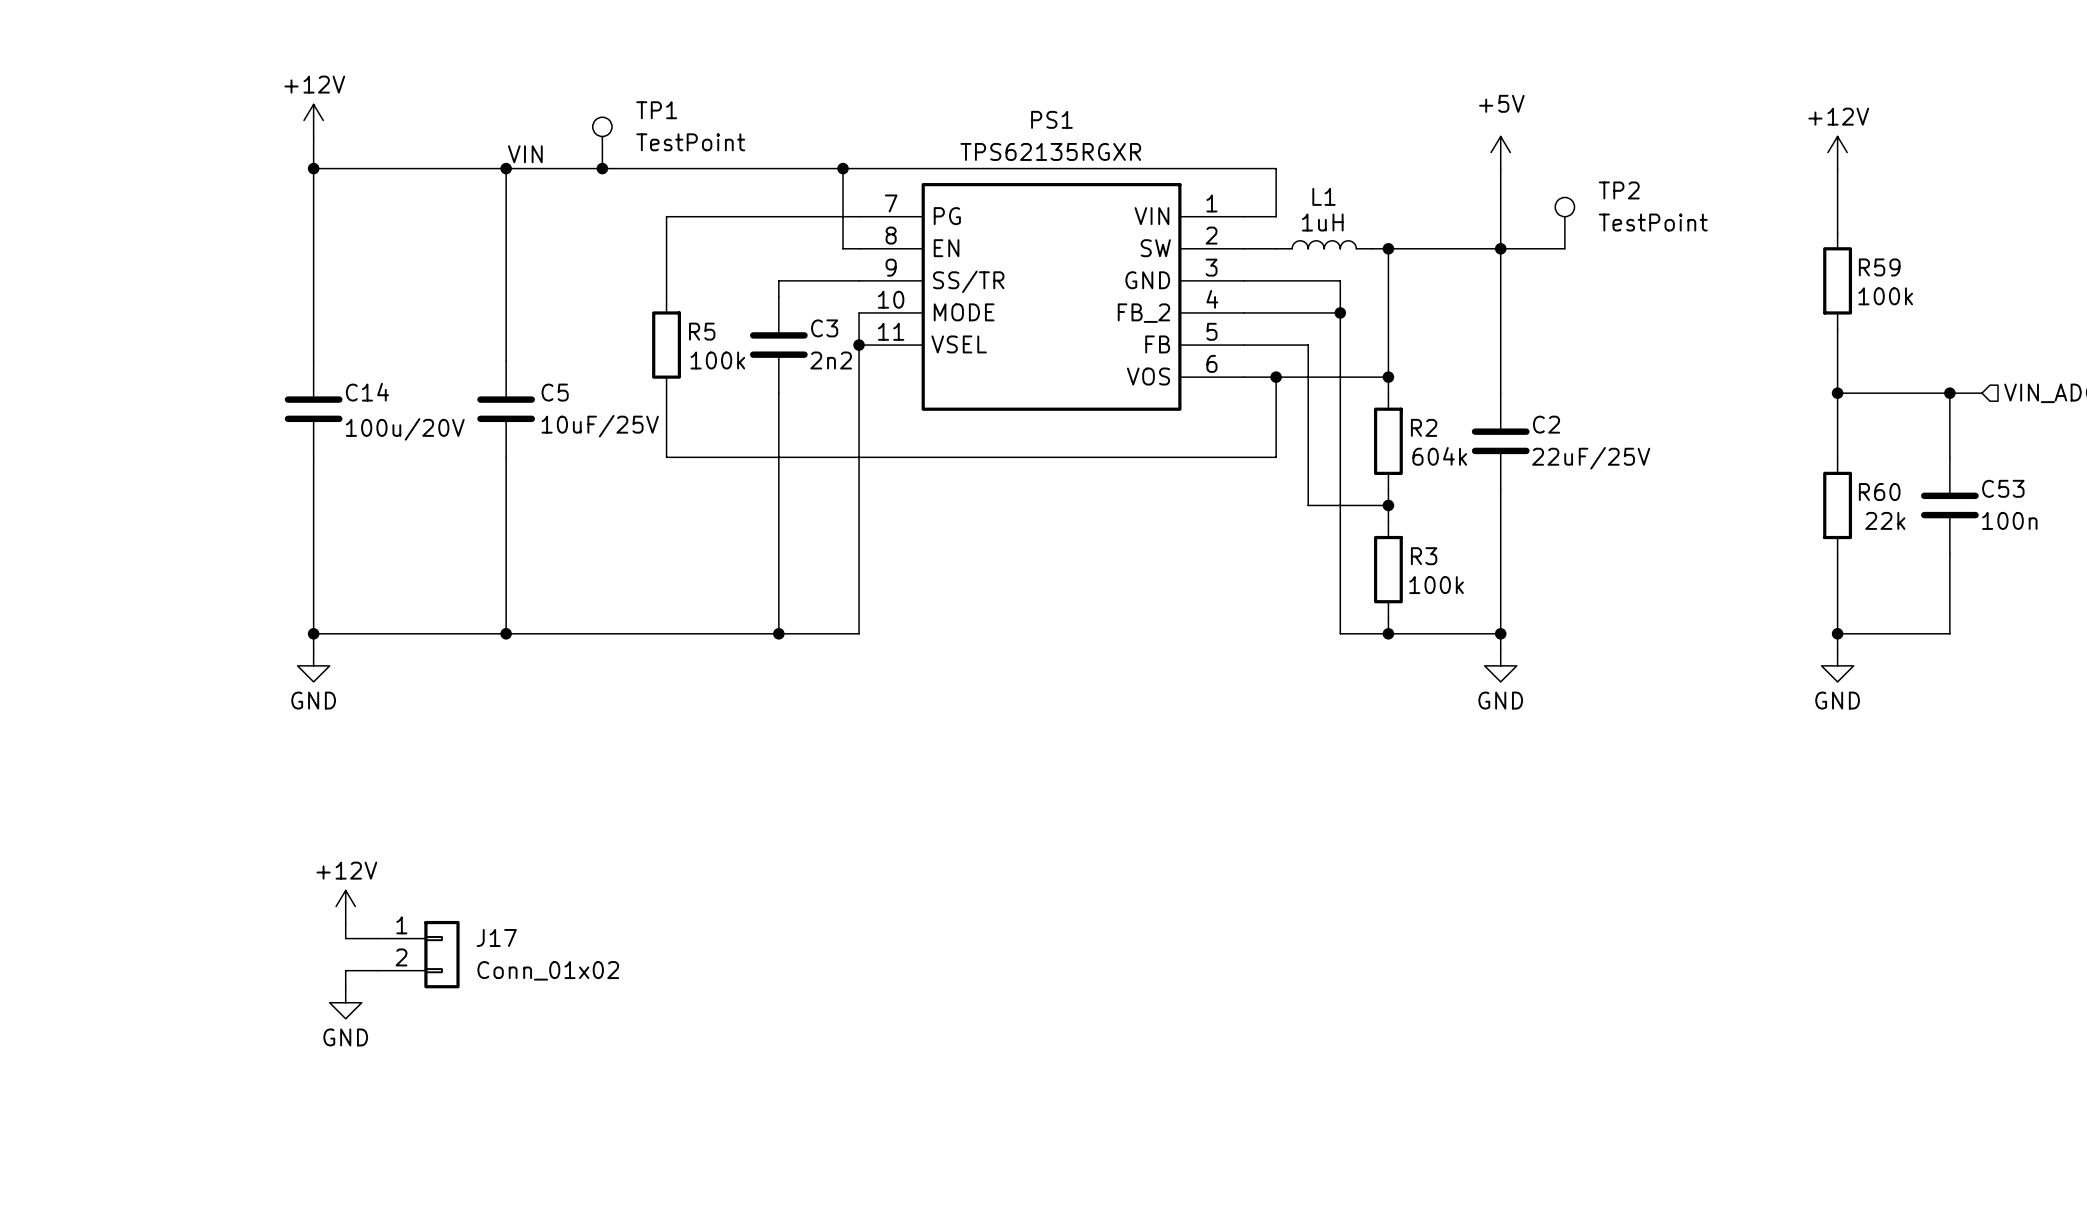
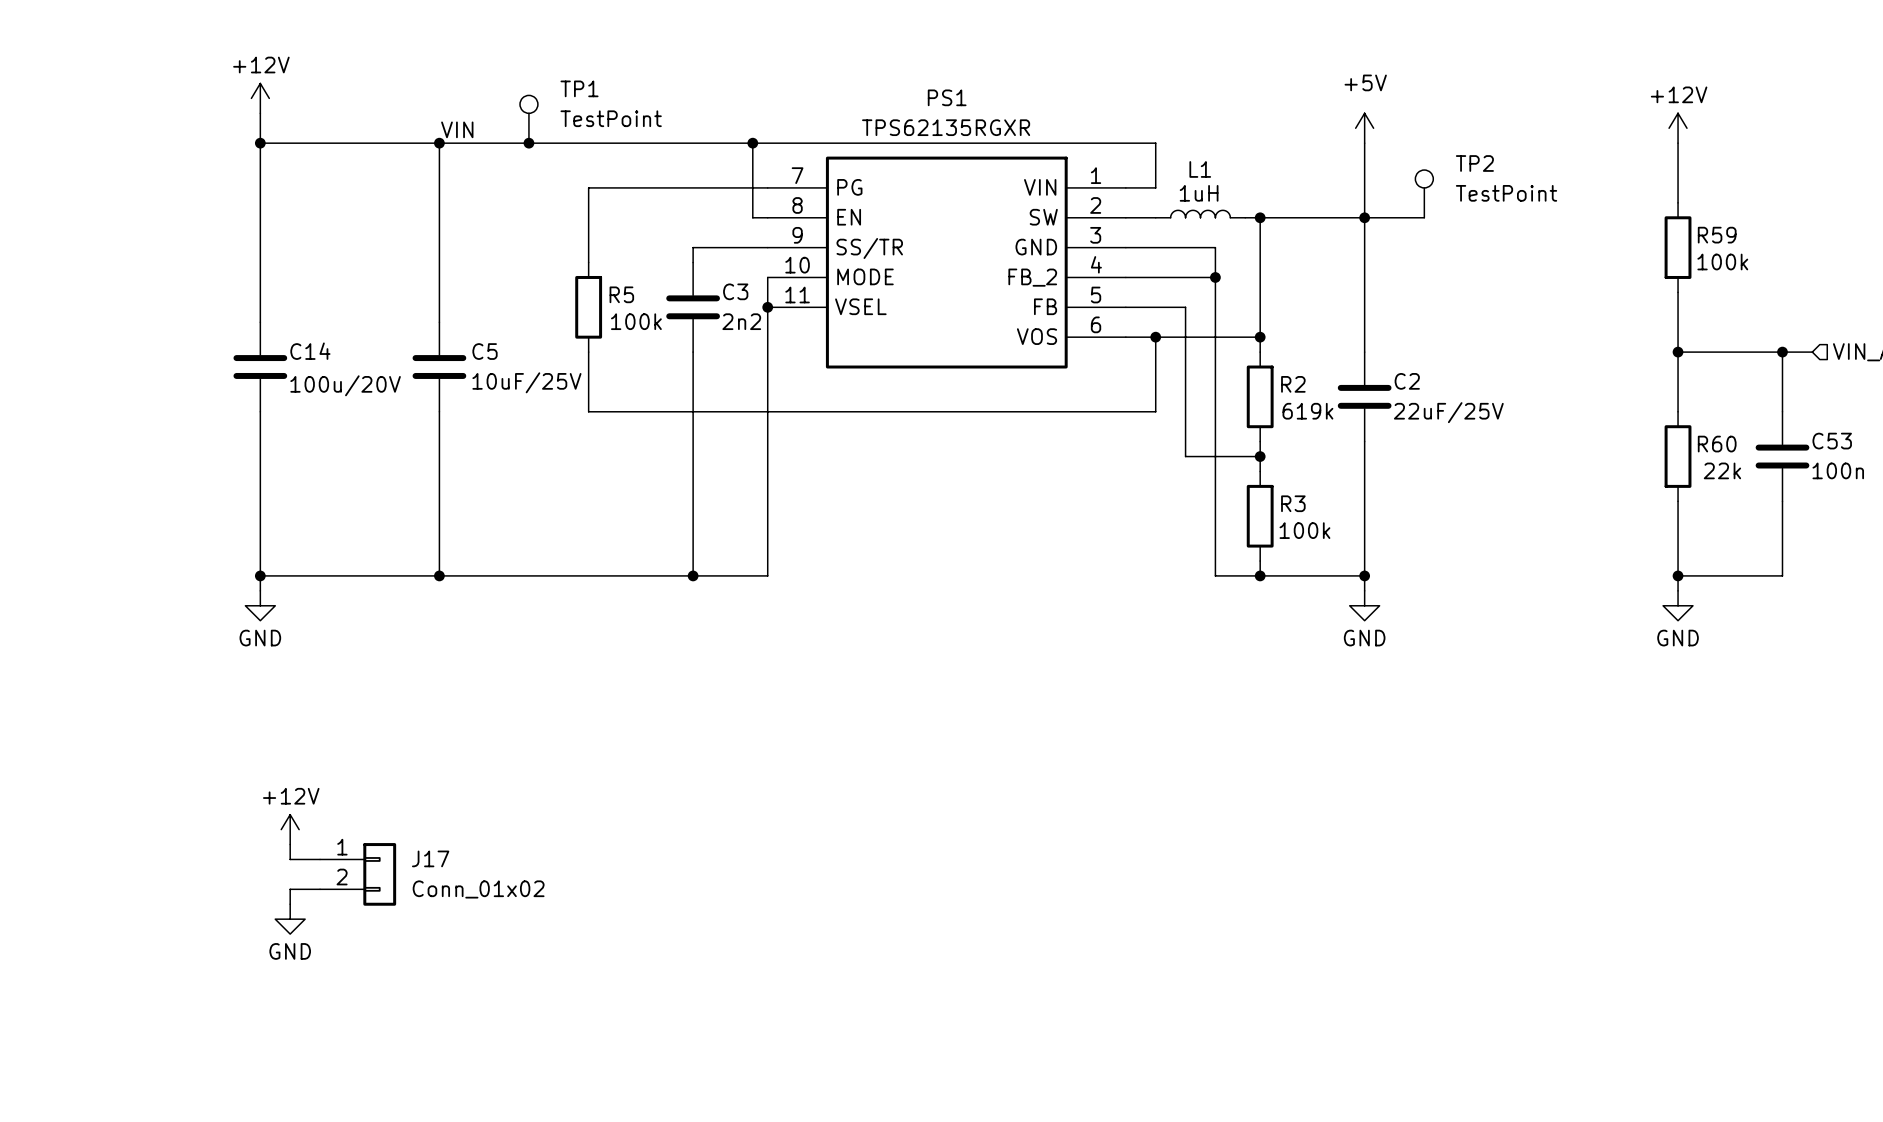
R2 value: 604k (1439, 456) -> 619k (1307, 411)

